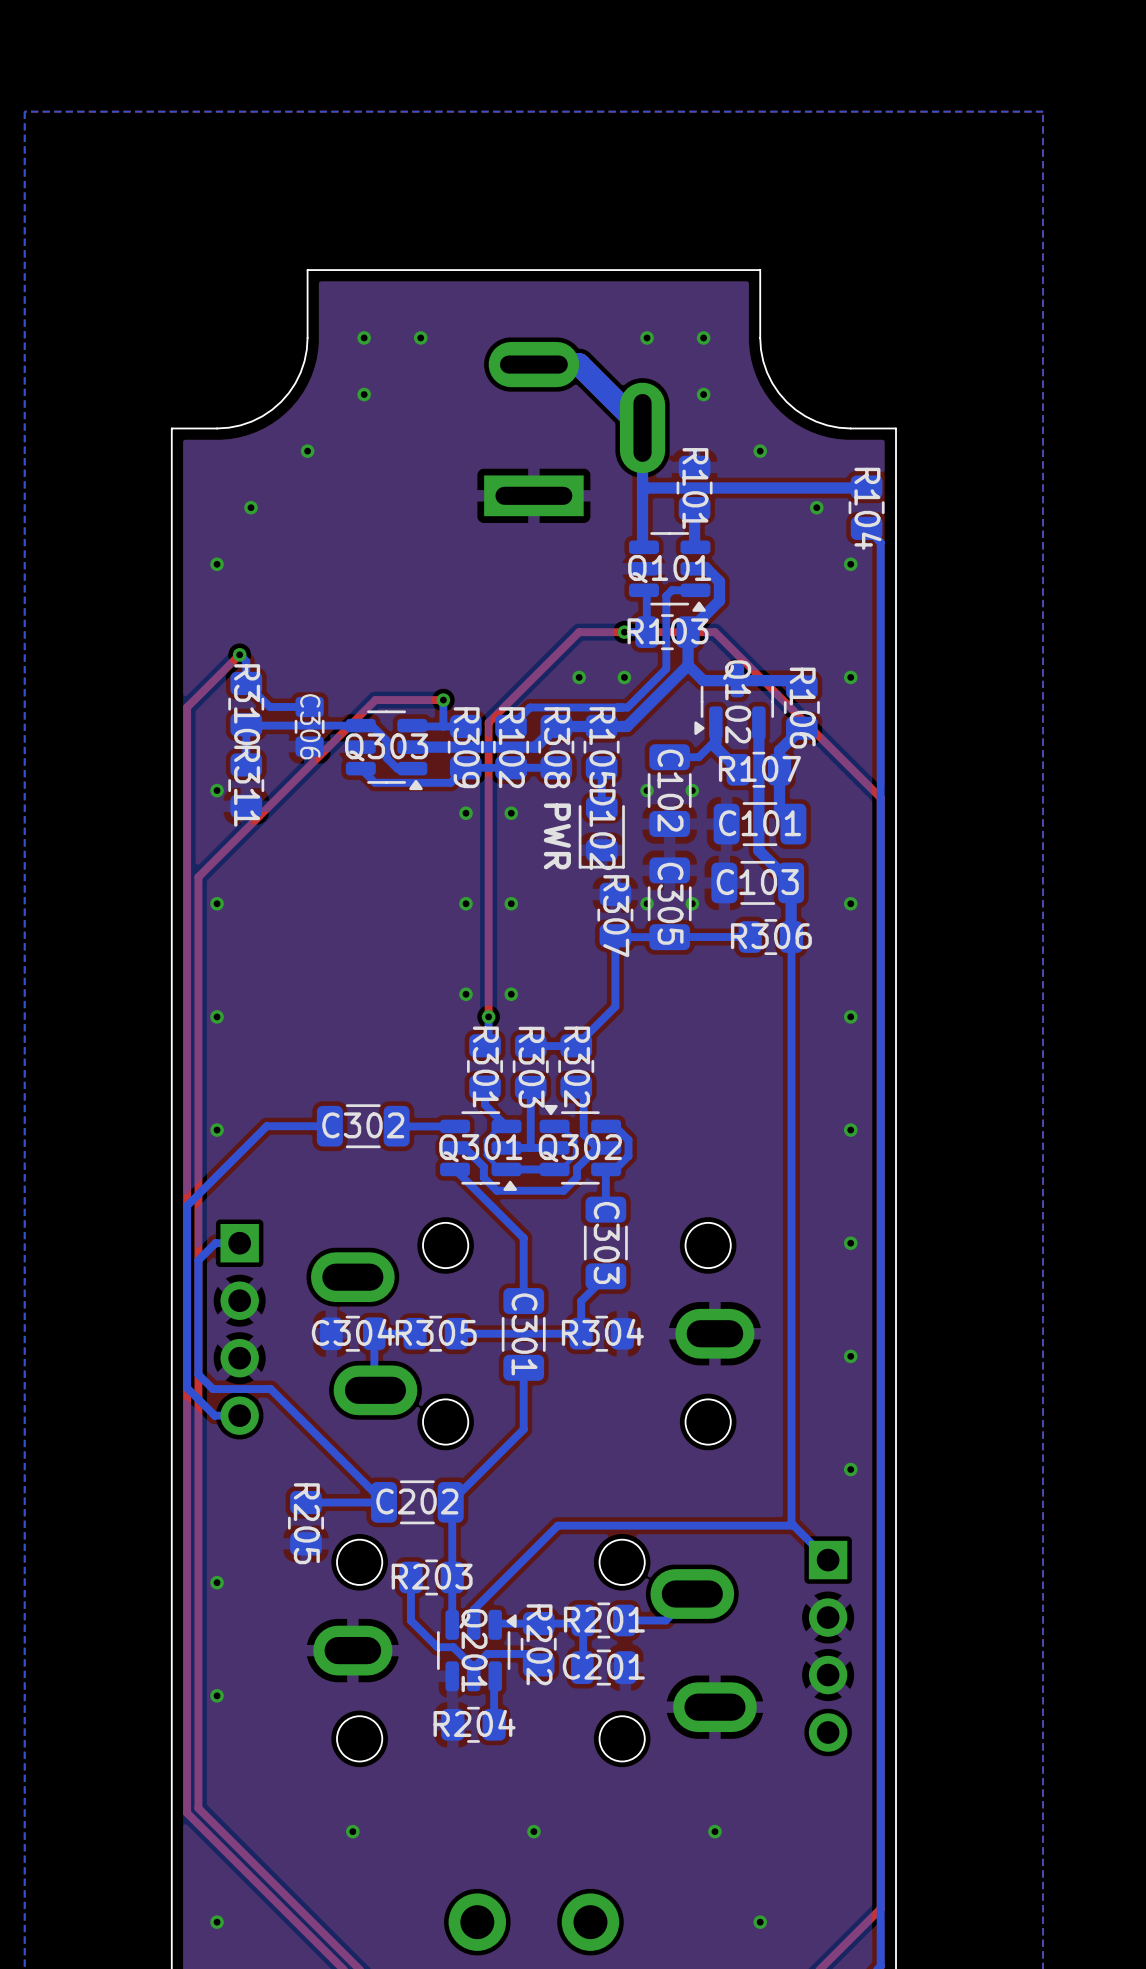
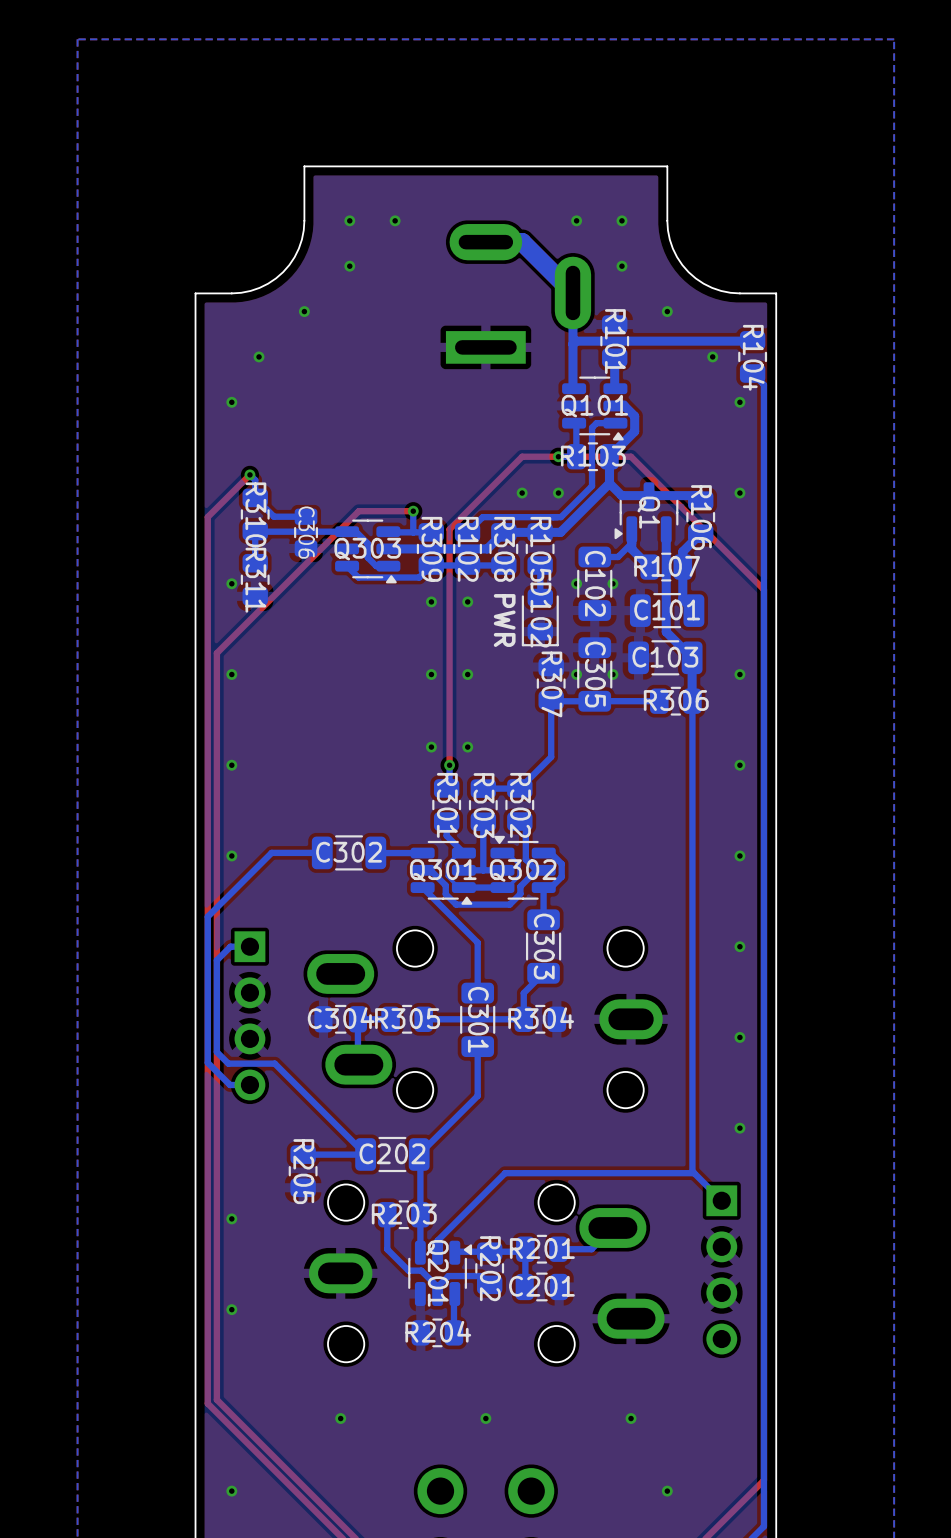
Q102 name: Q102 (737, 701) -> Q1 (648, 512)

